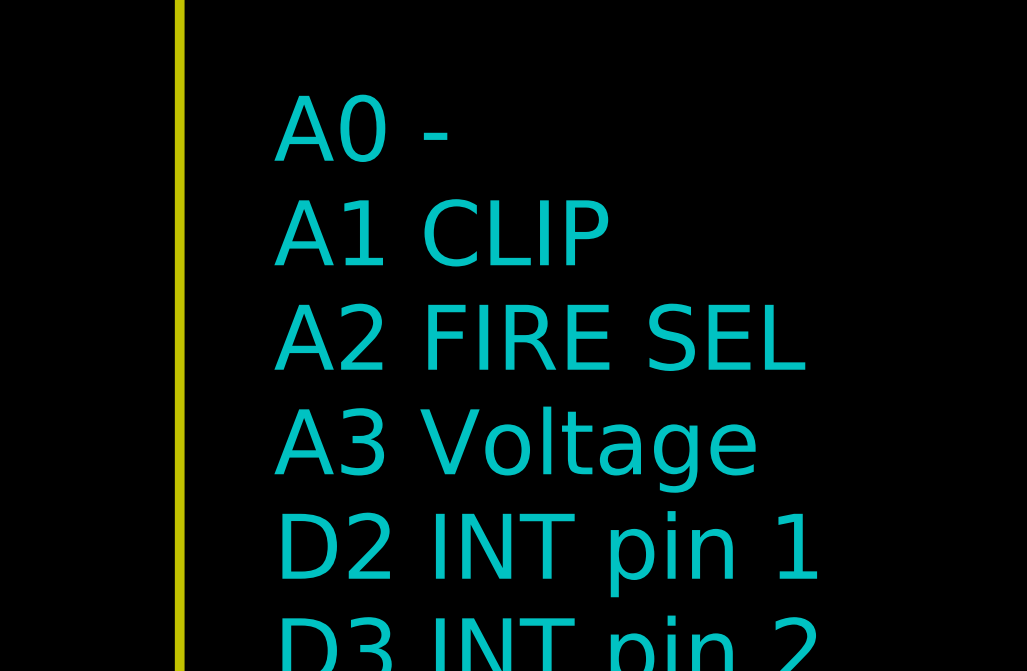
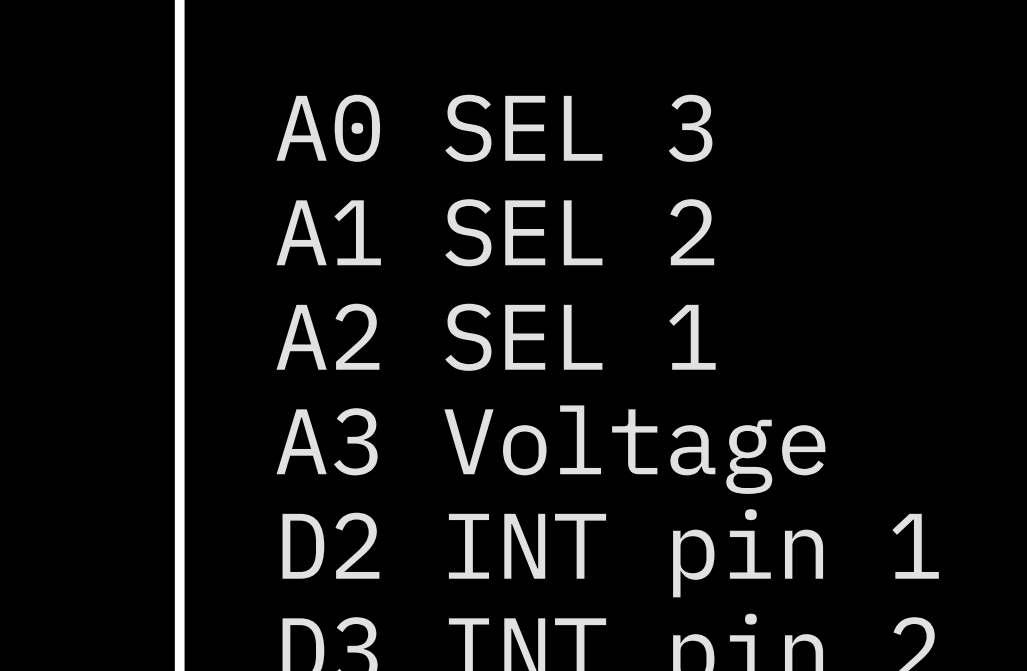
text: A0 - (360, 128) -> A0 SEL 3 (494, 128)
text: A1 CLIP (441, 232) -> A1 SEL 2 (495, 232)
text: A2 FIRE SEL (539, 337) -> A2 SEL 1 (496, 337)

